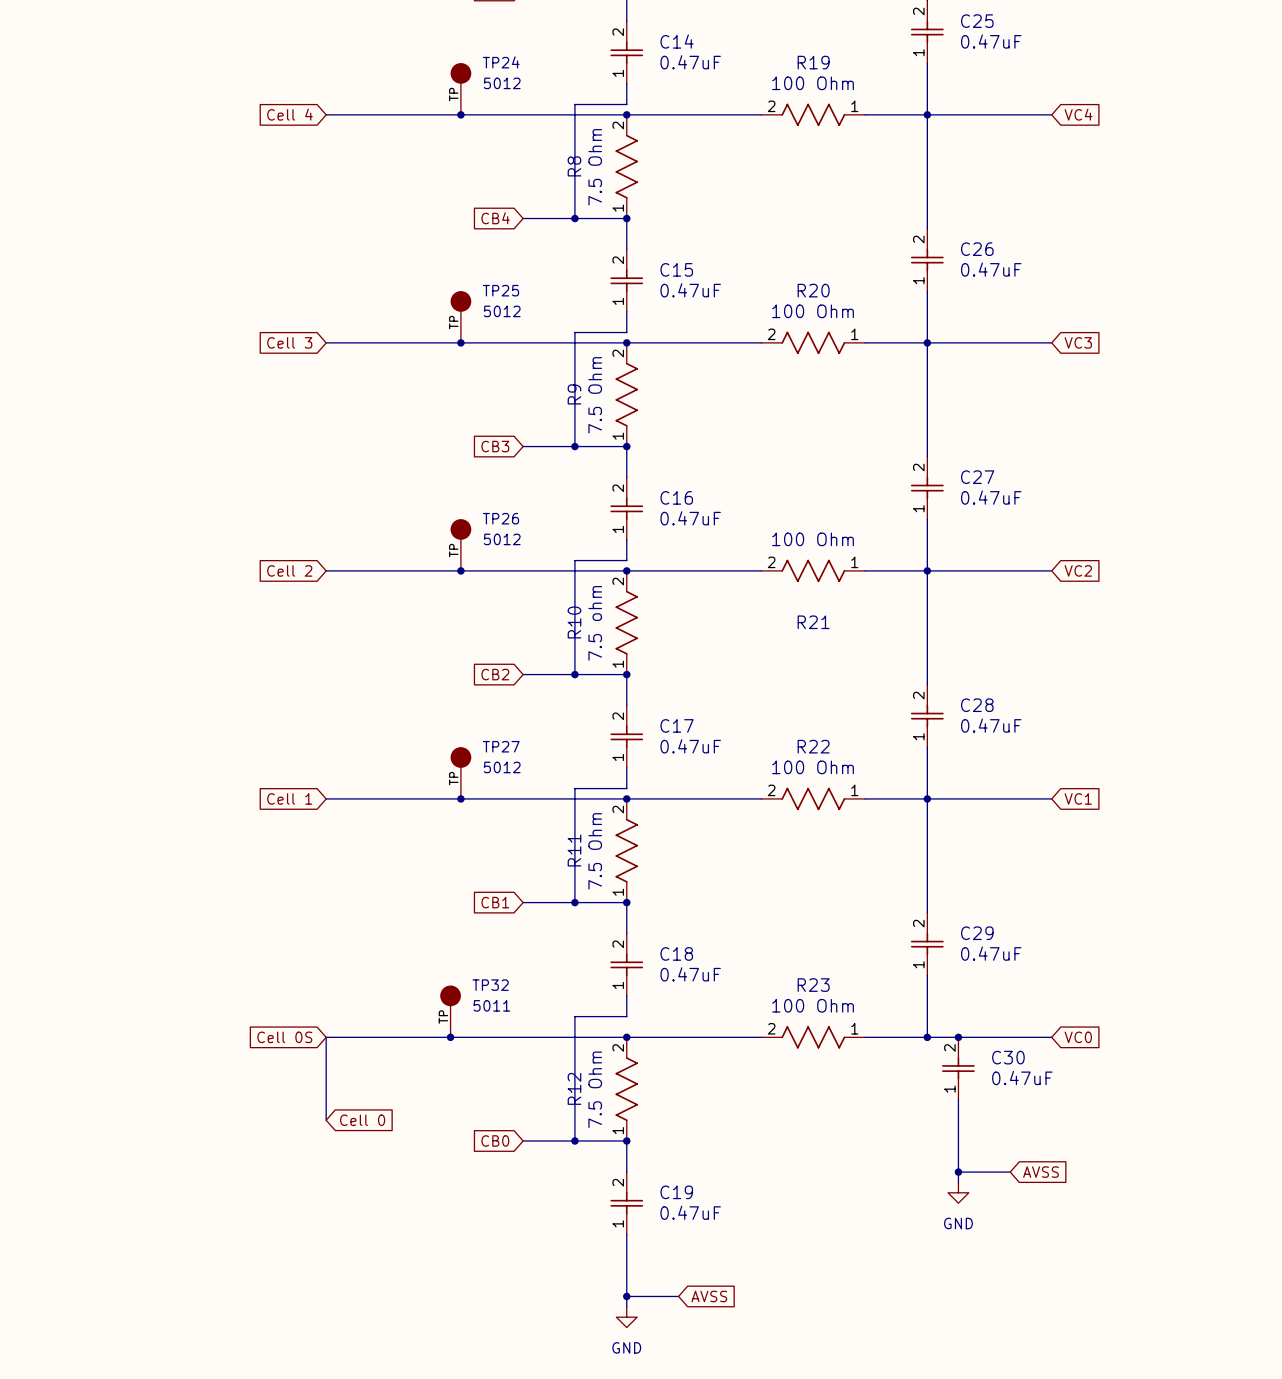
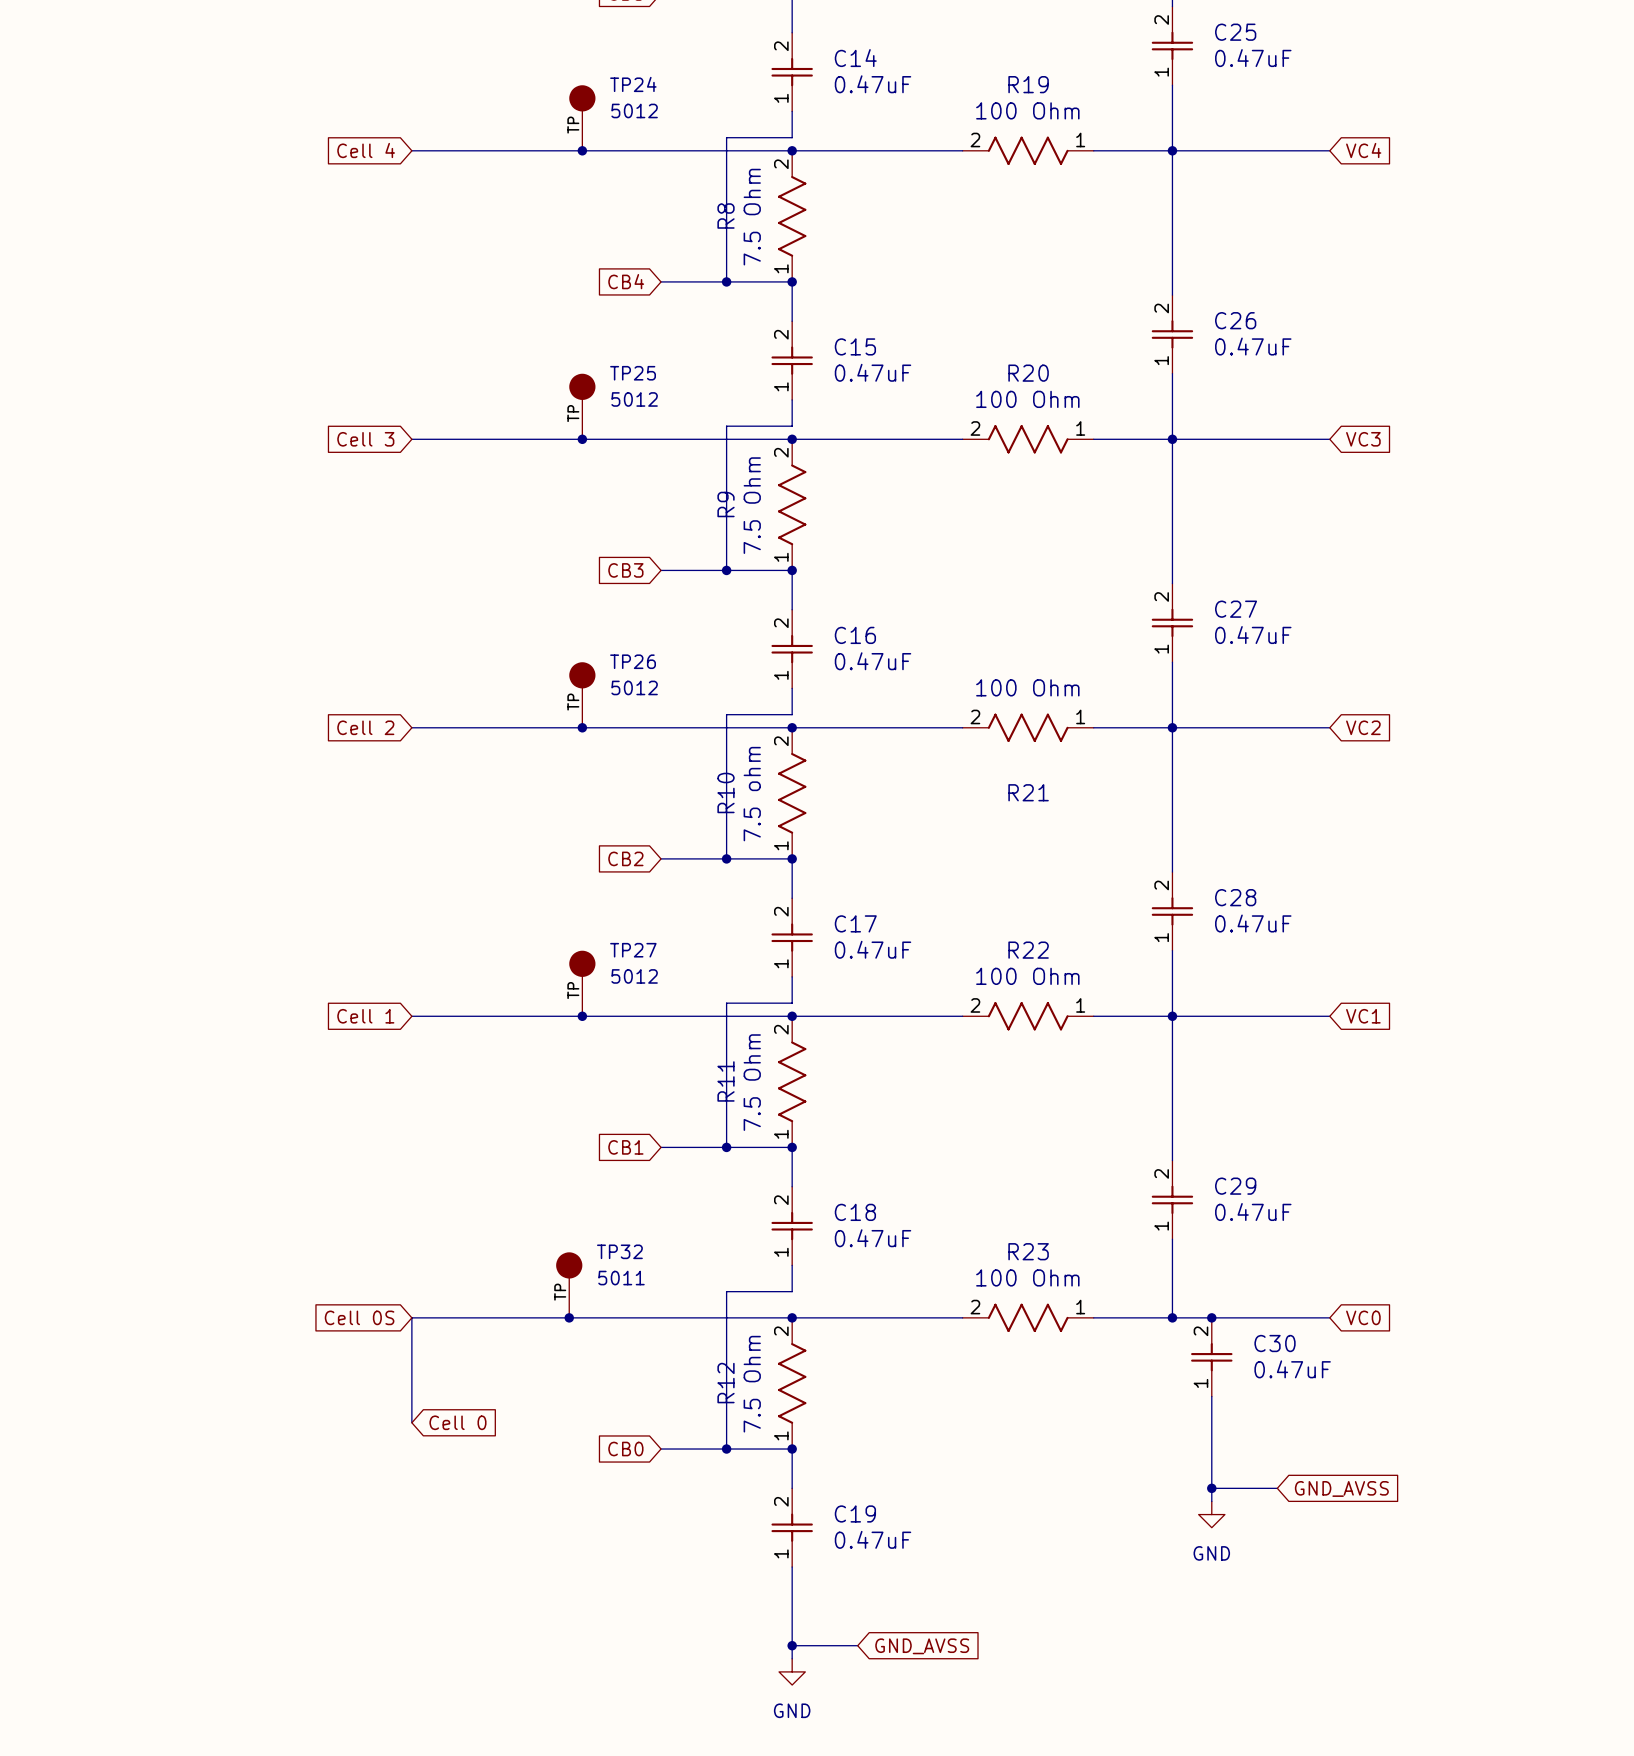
global label: AVSS (1041, 1172) -> GND_AVSS (1341, 1488)
global label: AVSS (709, 1296) -> GND_AVSS (922, 1646)

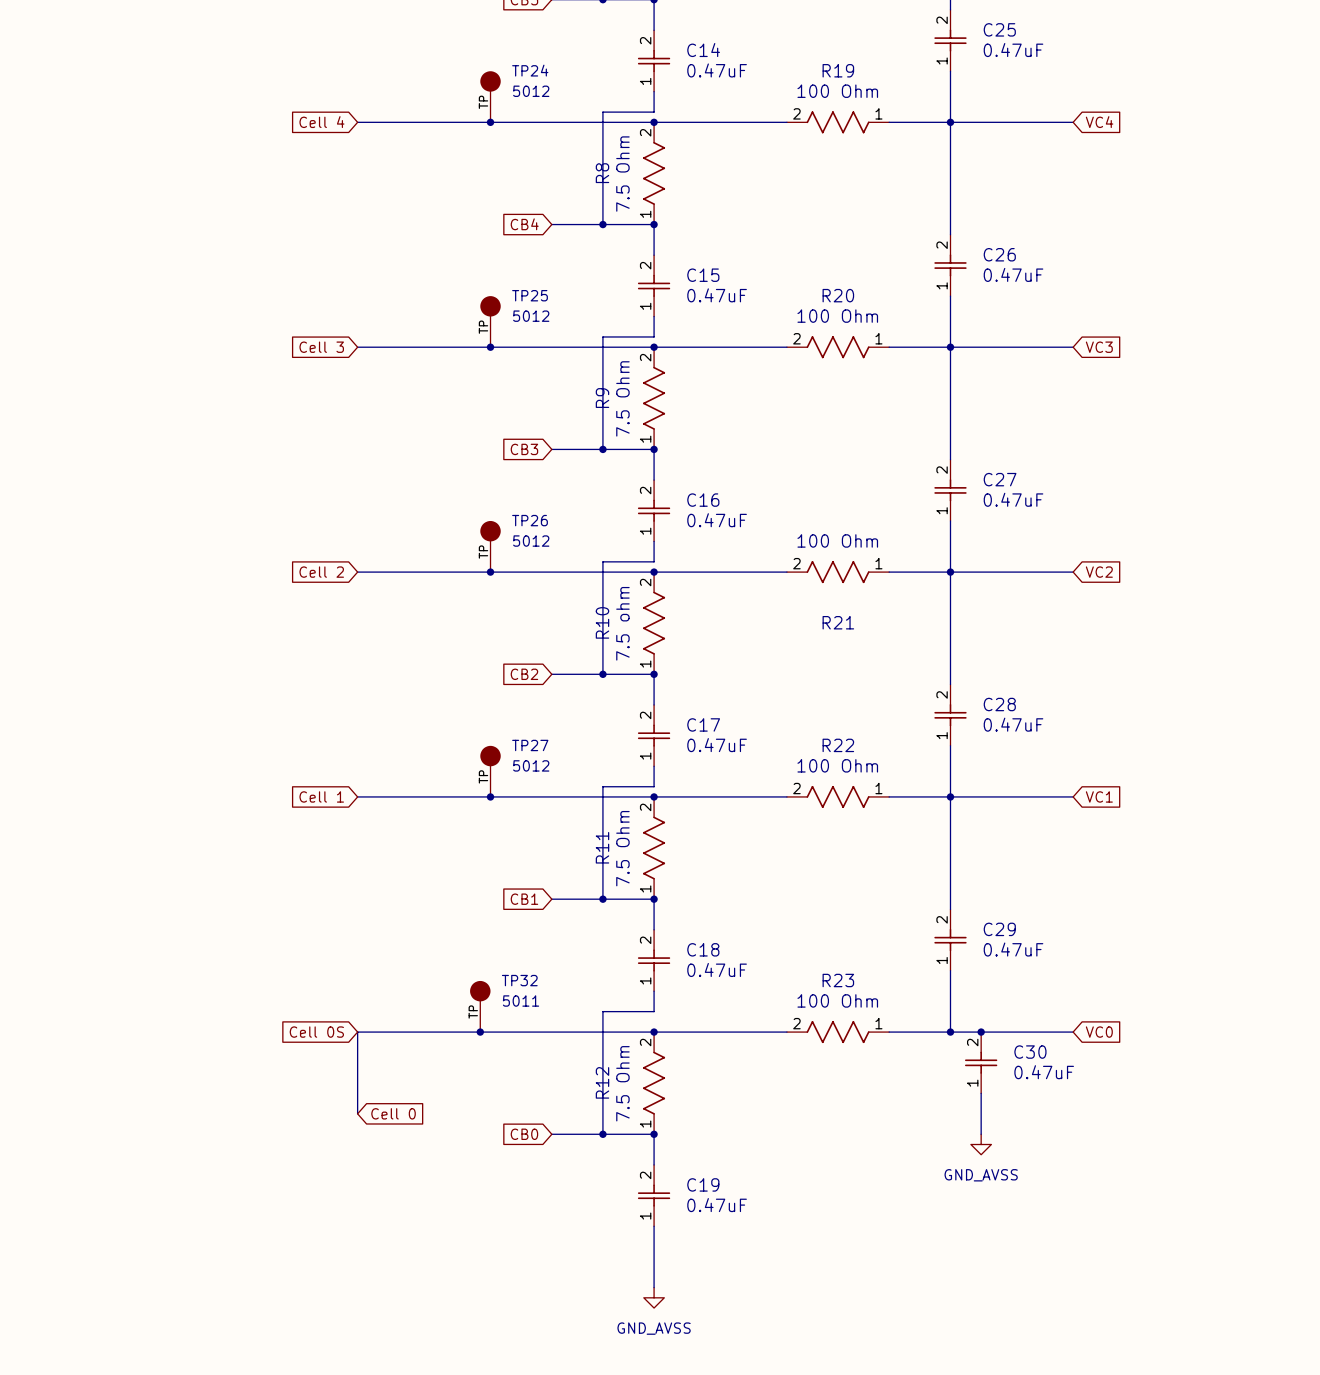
wire: (1211, 1449) (1211, 1501) -> none
power symbol: none -> GND_AVSS (981, 1144)
wire: (1211, 1488) (1277, 1488) -> none
junction: (1211, 1488) -> none
global label: GND_AVSS (1341, 1488) -> none
power symbol: GND (1211, 1514) -> none
junction: (792, 1645) -> none
wire: (857, 1645) (792, 1645) (792, 1658) -> none
global label: GND_AVSS (922, 1646) -> none
power symbol: none -> GND_AVSS (654, 1297)
power symbol: GND (792, 1671) -> none

